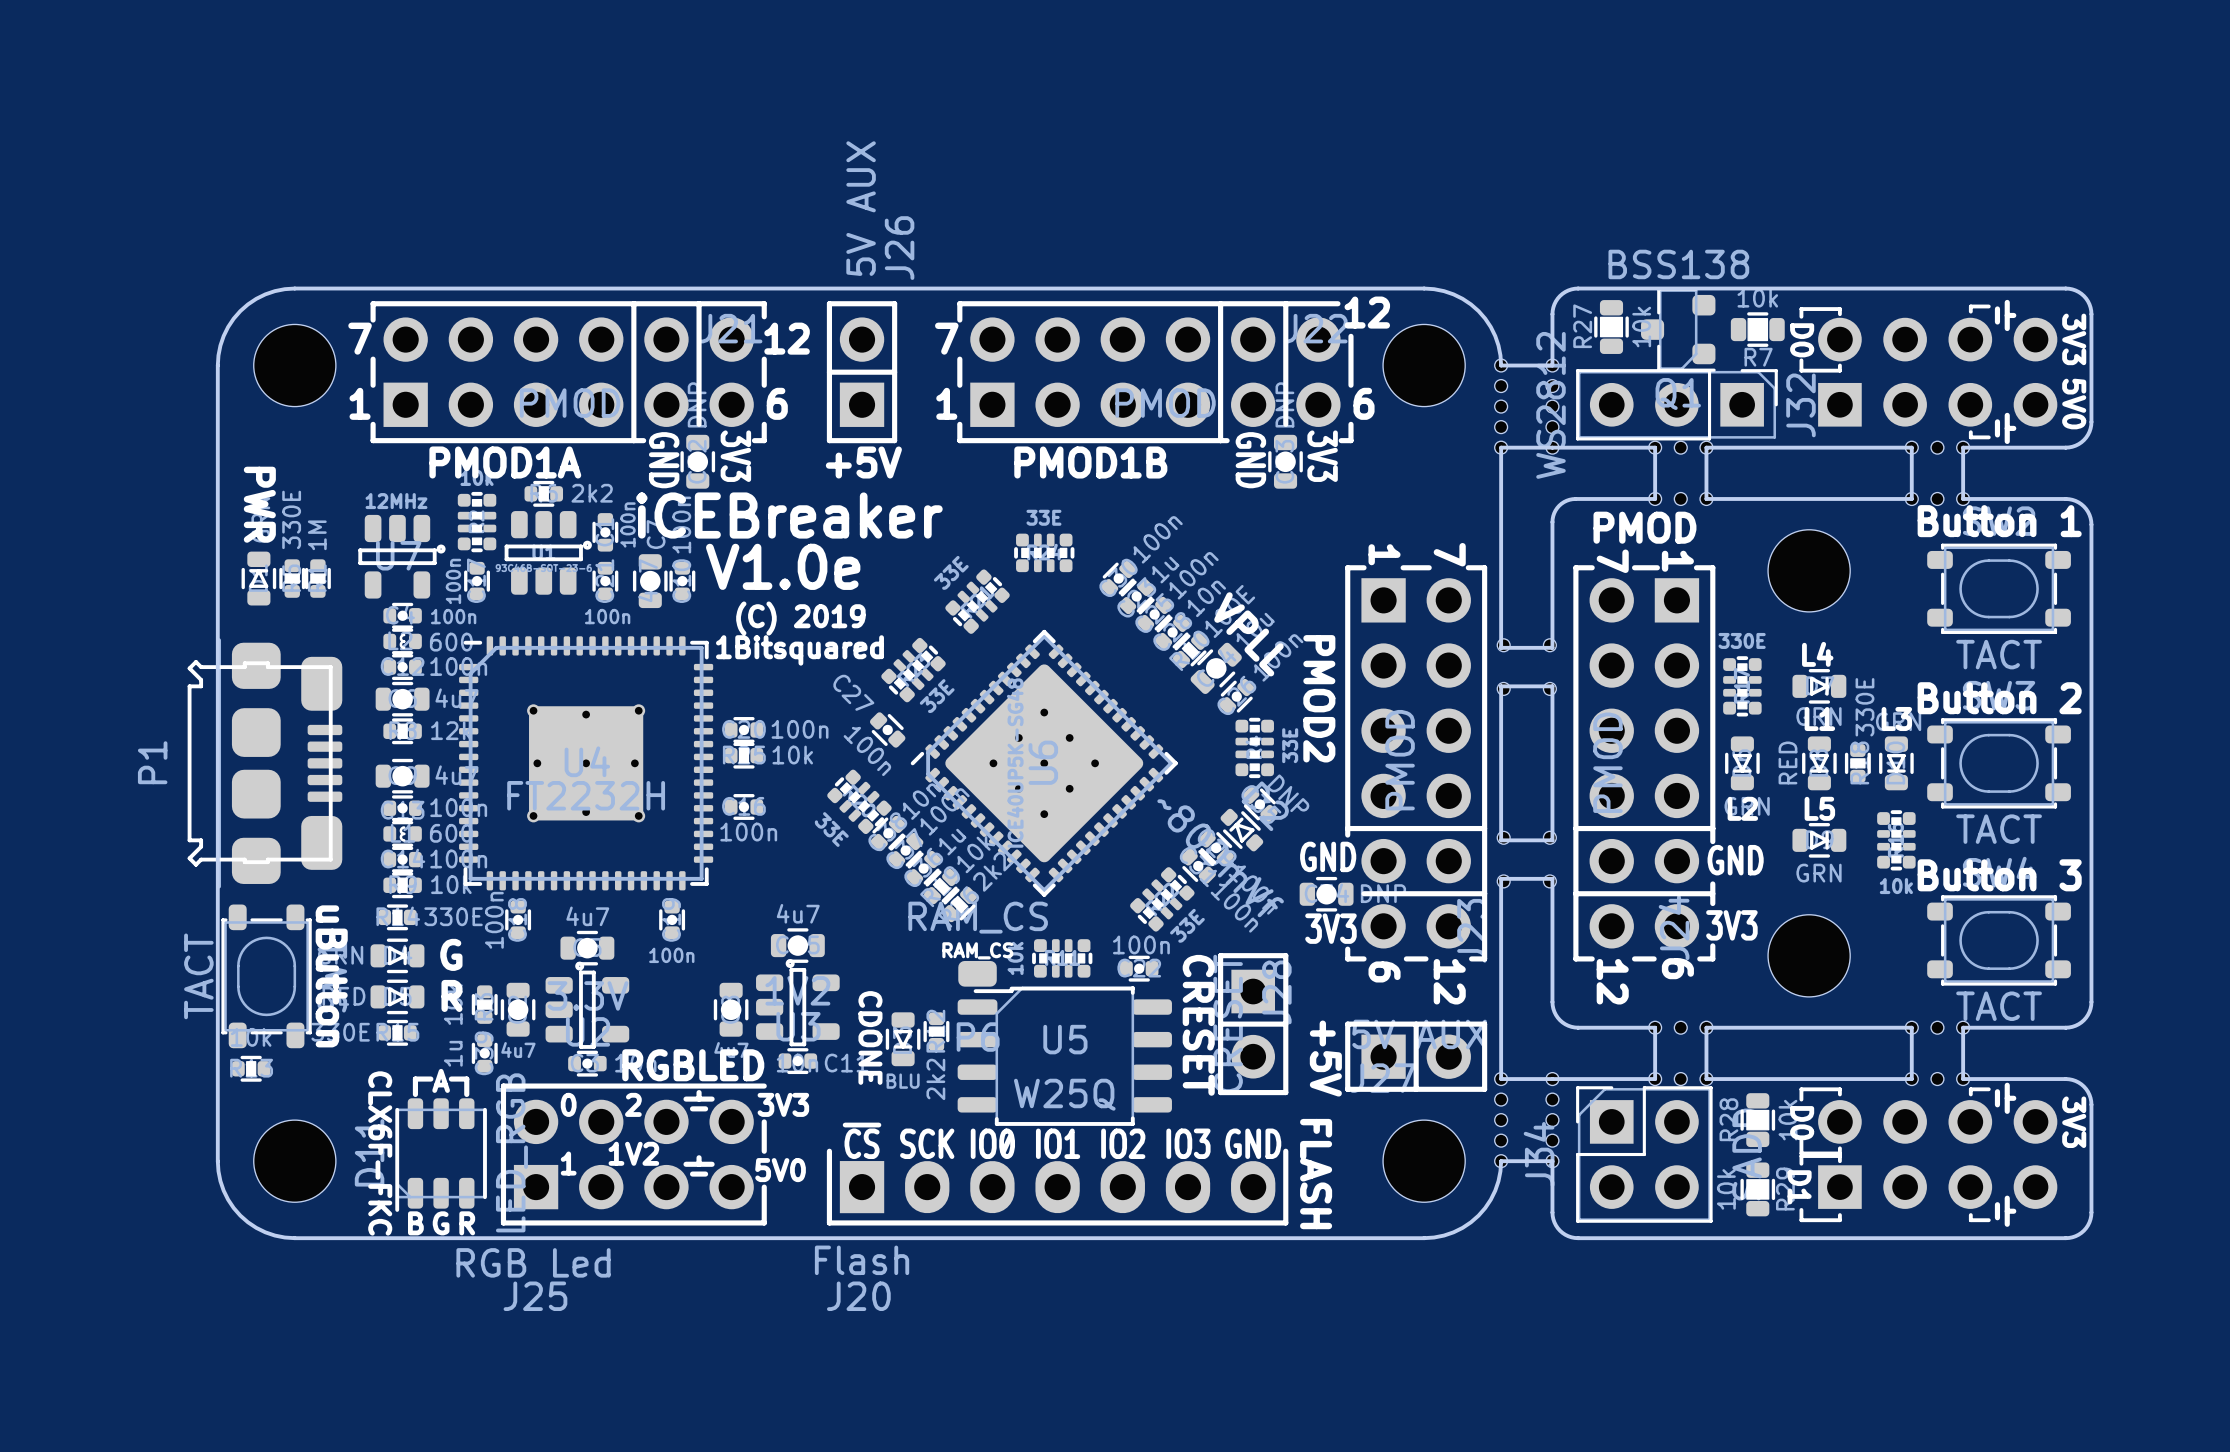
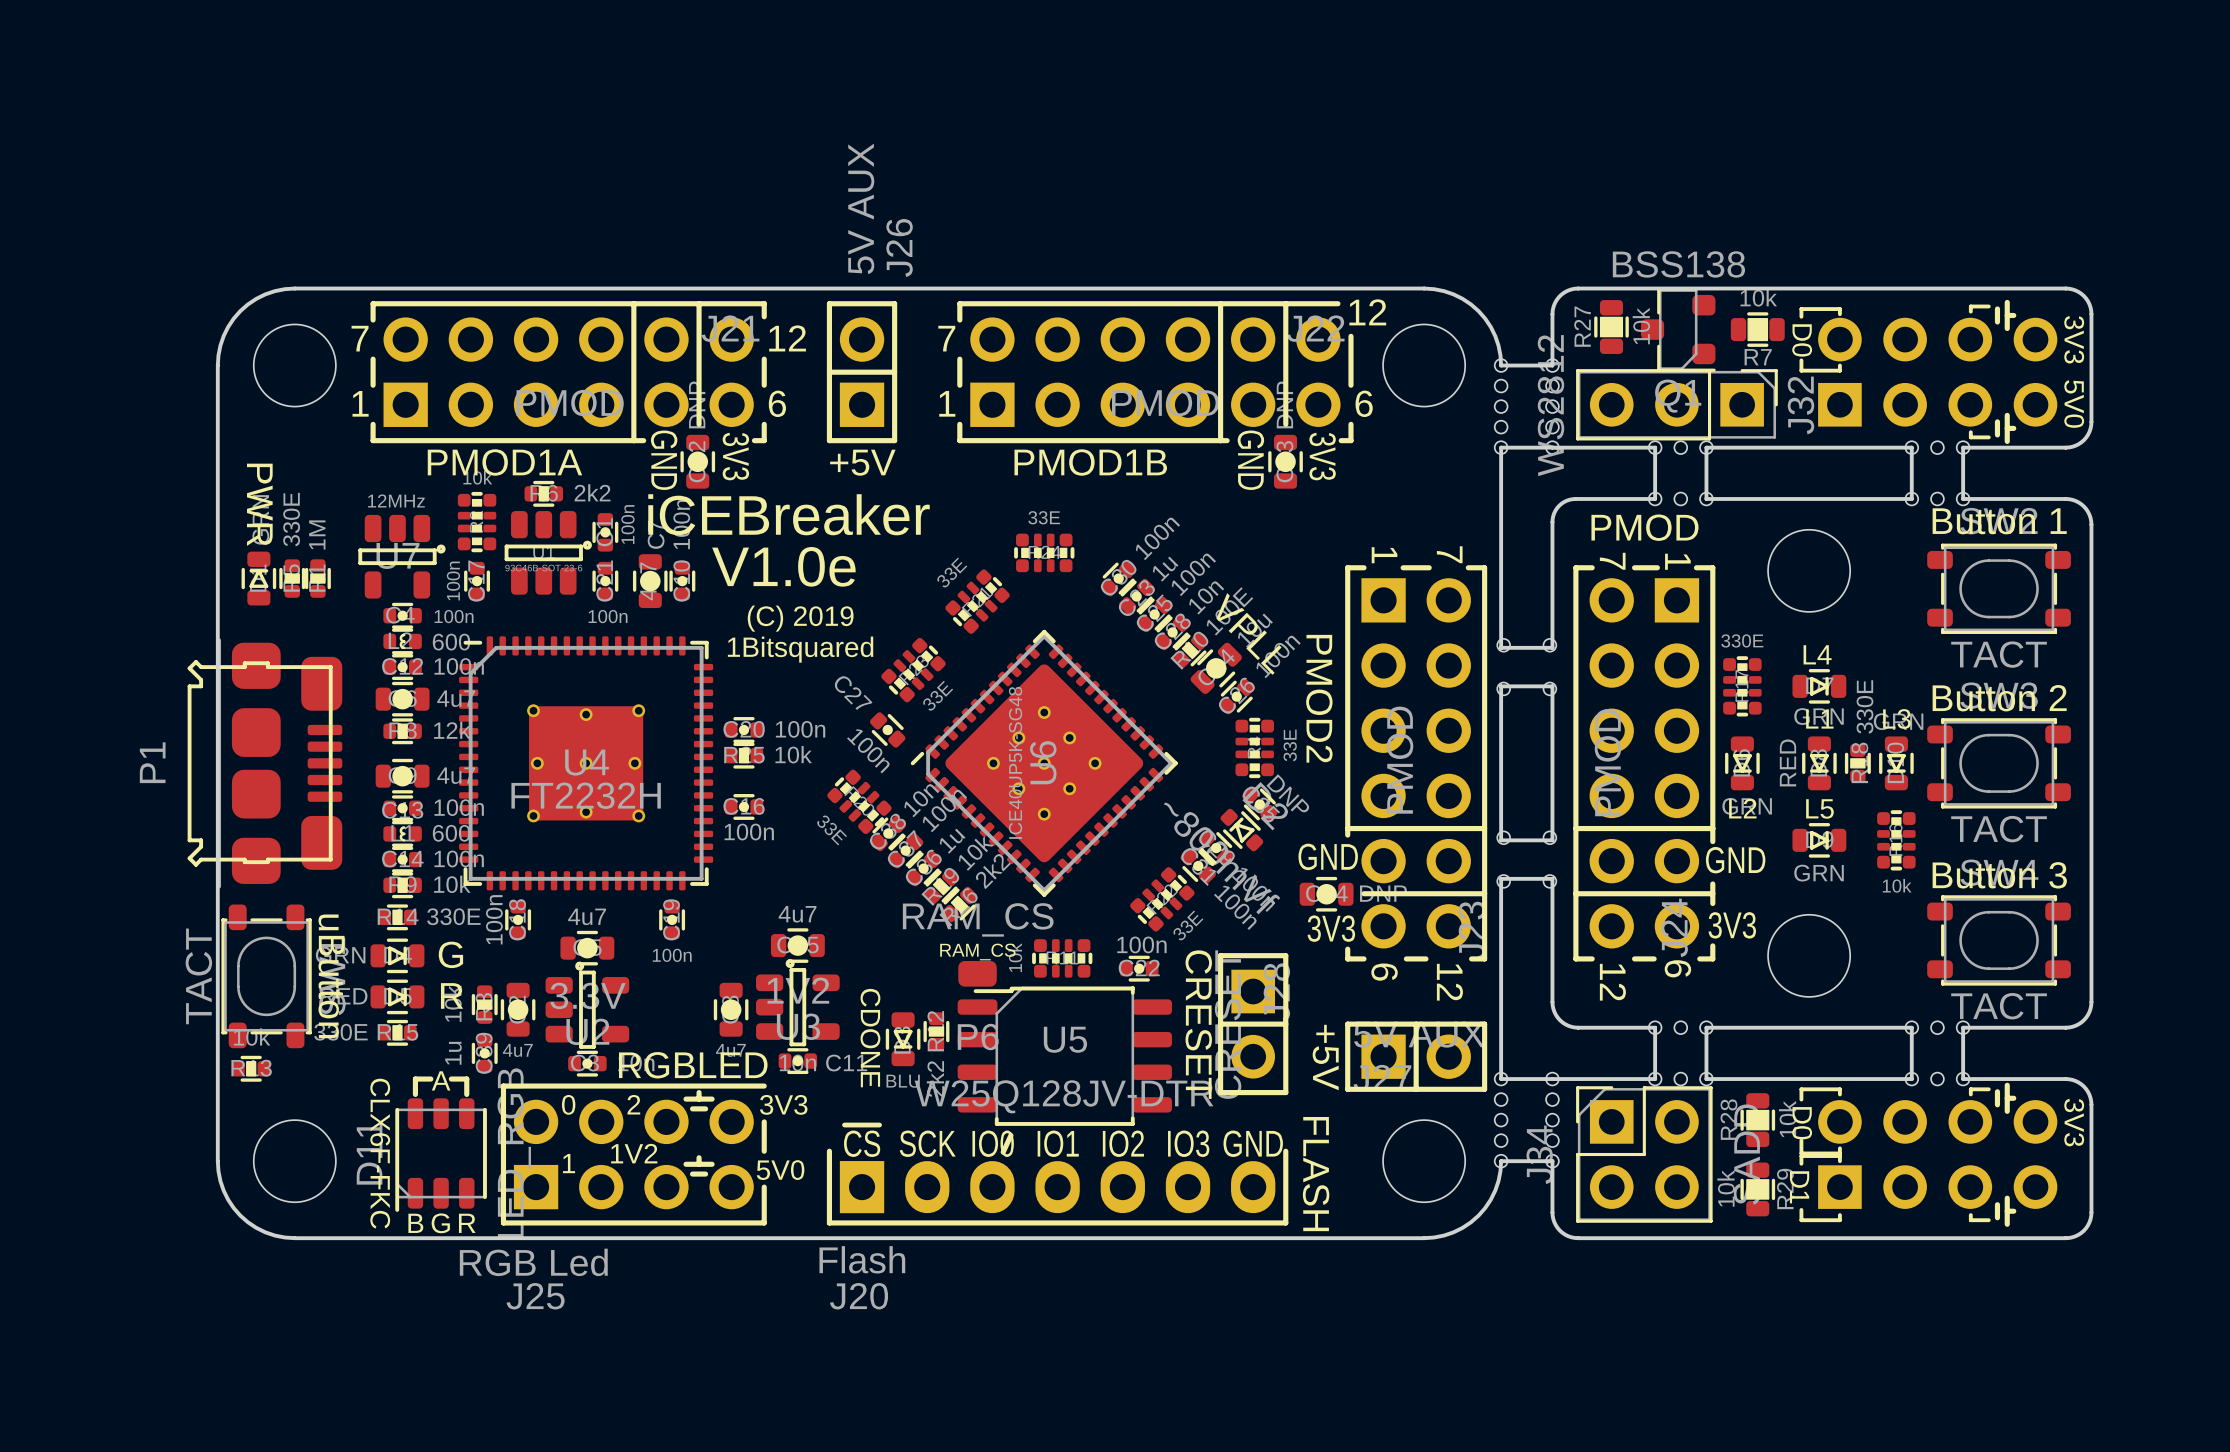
U5 value: W25Q (1064, 1094) -> W25Q128JV-DTR (1064, 1096)

